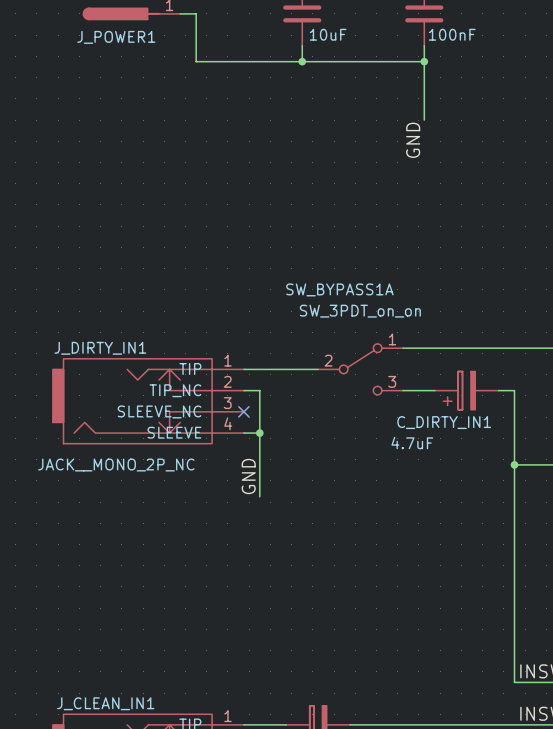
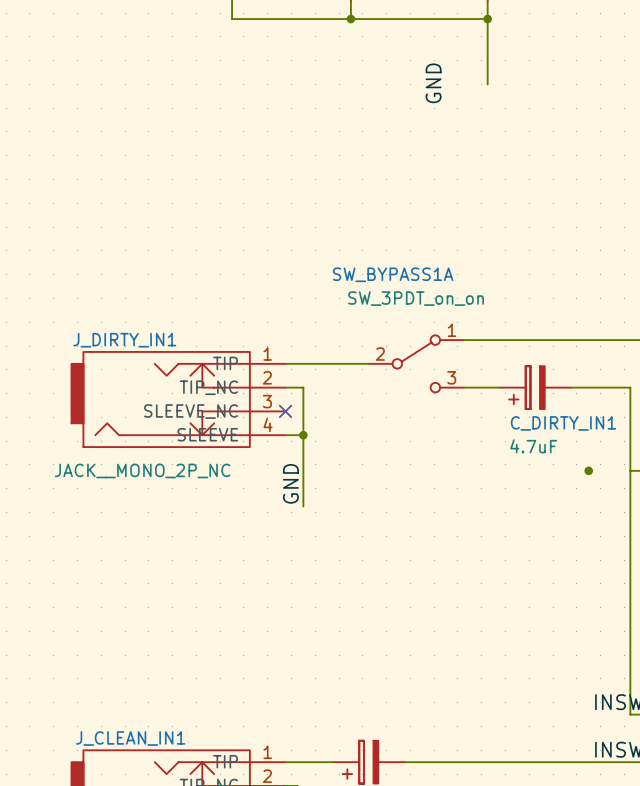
label position: GND (413, 140) -> GND (433, 83)
wire: (514, 390) (514, 682) (551, 682) -> (588, 387) (630, 387) (630, 714)
C_DIRTY_IN1 name position: C_DIRTY_IN1 (444, 422) -> C_DIRTY_IN1 (563, 423)
C_DIRTY_IN1 value position: 4.7uF (412, 443) -> 4.7uF (533, 446)
wire: (514, 464) (551, 464) -> none

